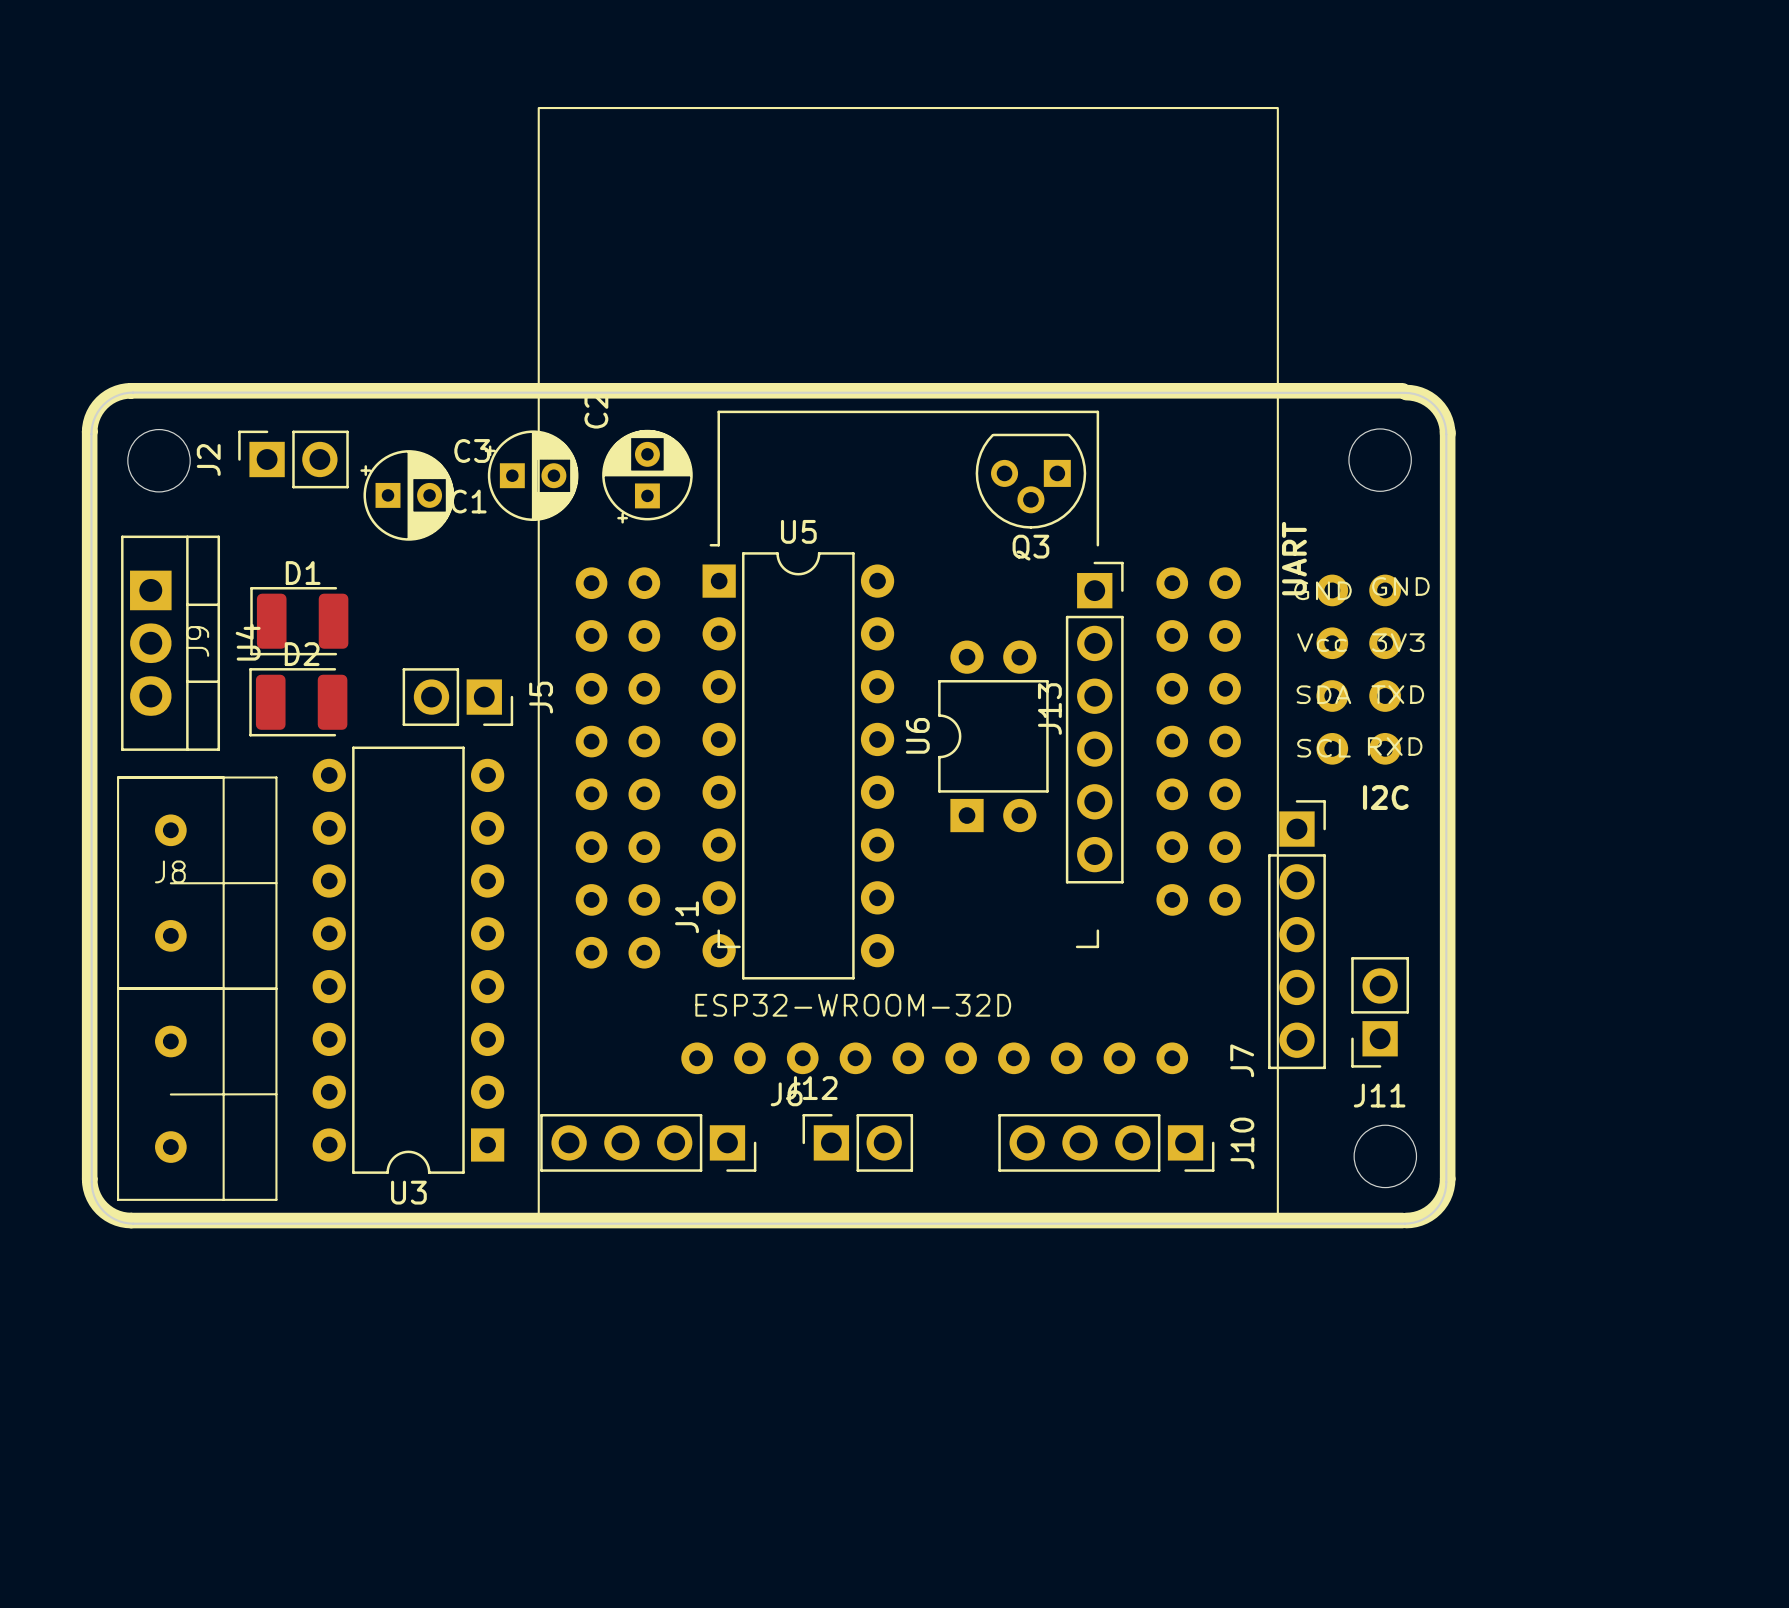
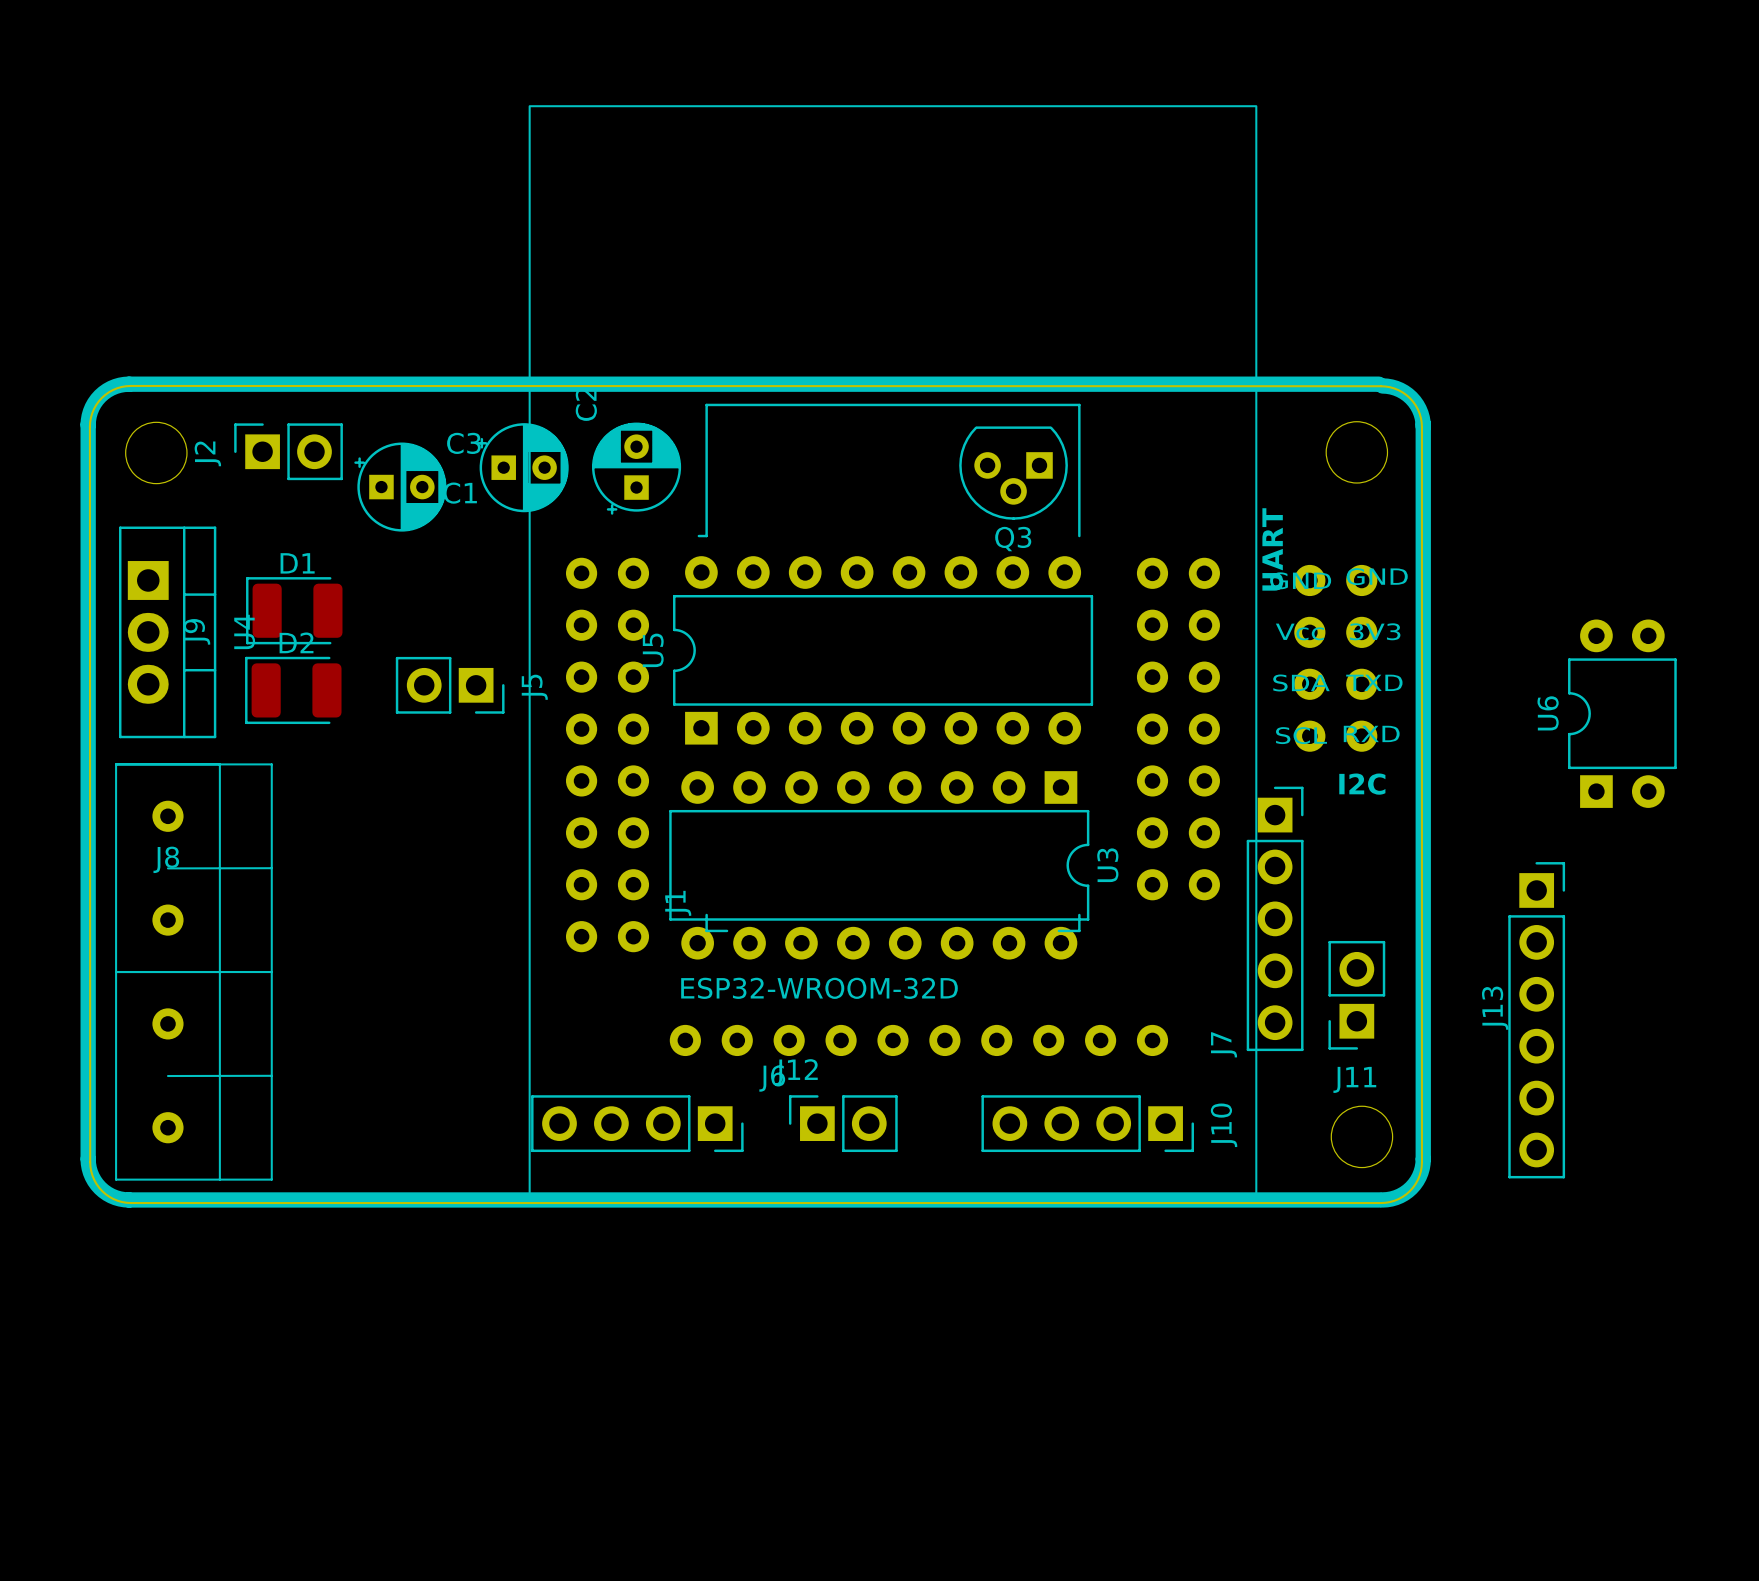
J13 position: (1094, 722) -> (1536, 1020)
U6 position: (993, 736) -> (1622, 713)
U5 rotation: 0° (798, 765) -> 90° counterclockwise (883, 650)
U3 rotation: 0° (408, 960) -> 90° counterclockwise (879, 865)
U3 position: (408, 960) -> (879, 865)

